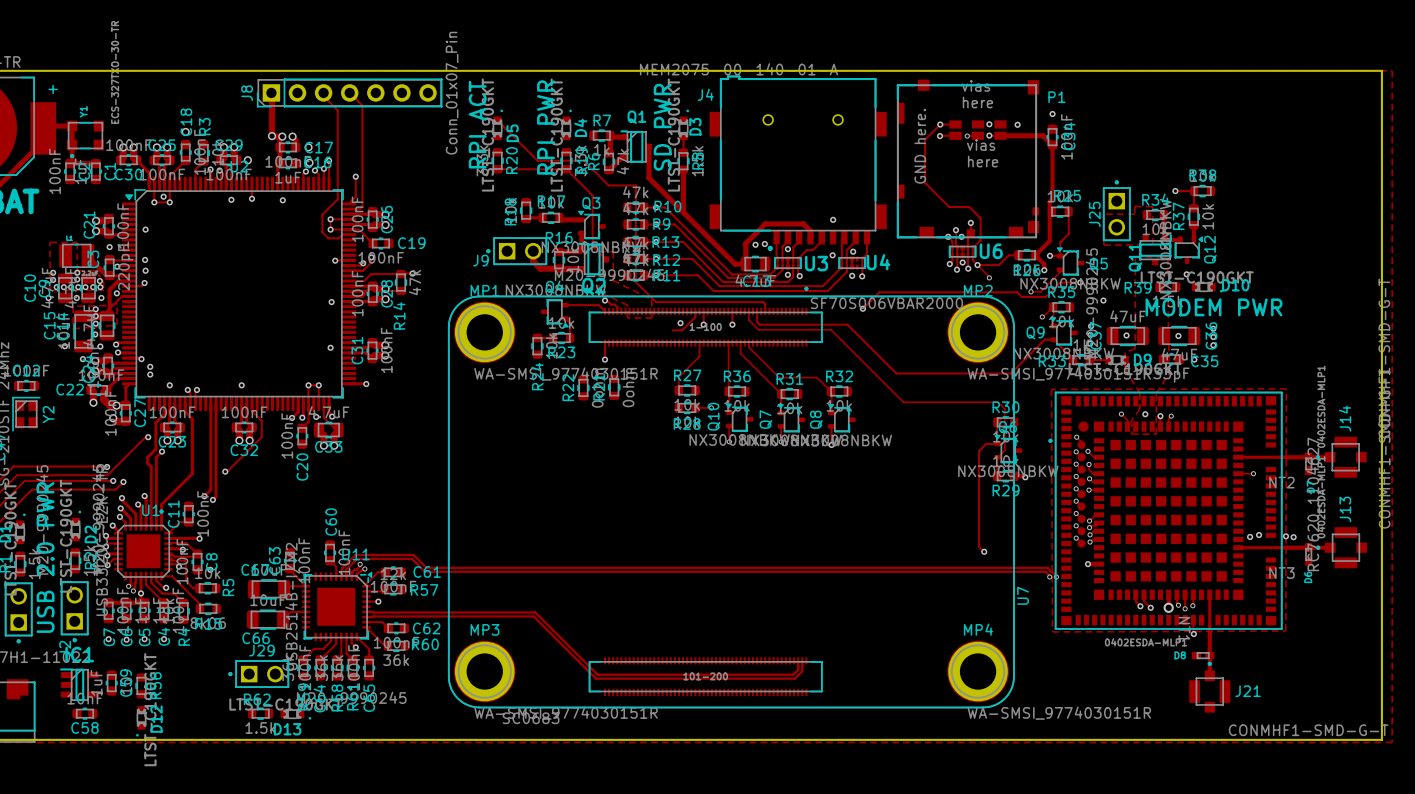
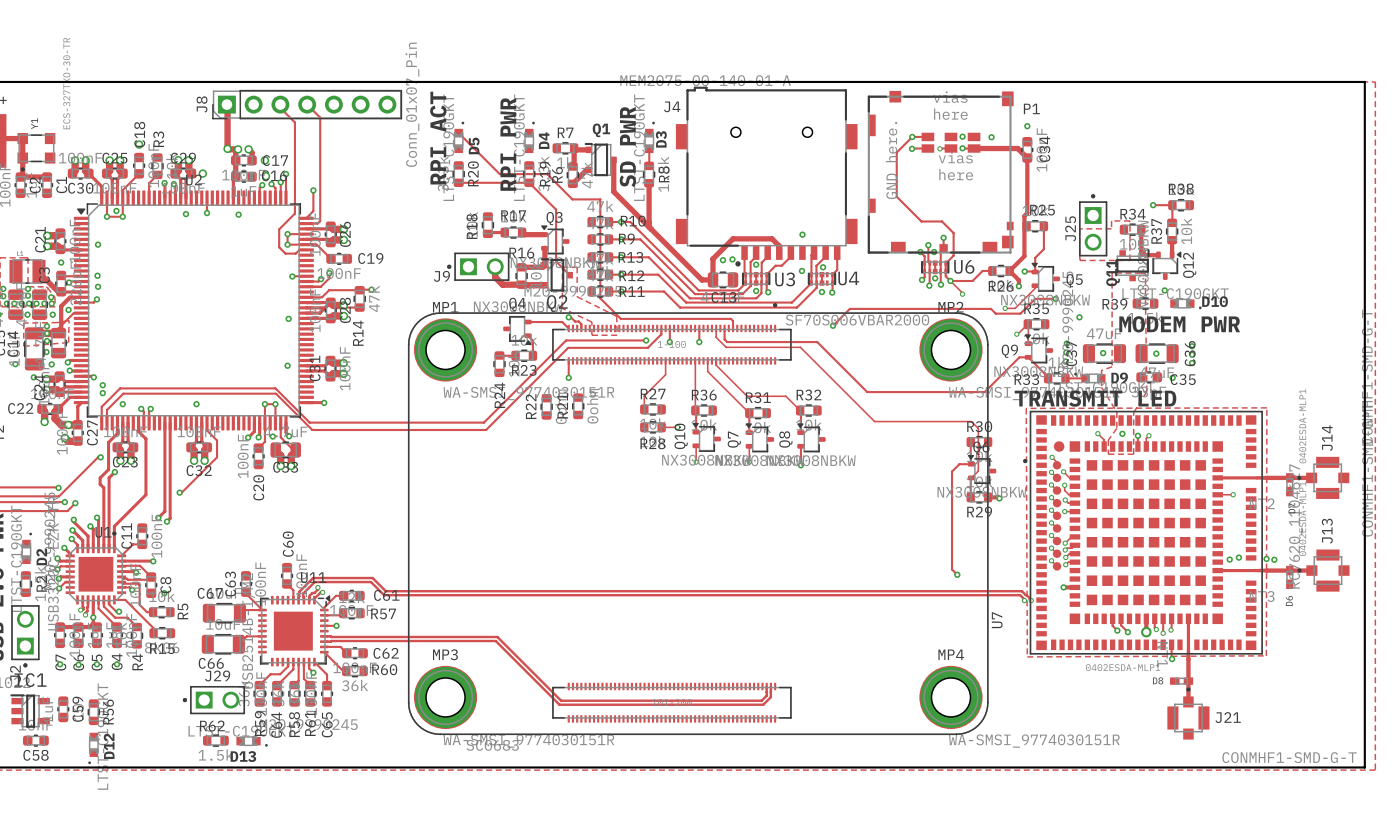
track: none -> (646, 340) (566, 340) (483, 422) (309, 422) (275, 388) (120, 388) (101, 406) (101, 422)
track: none -> (638, 347) (568, 347) (486, 429) (312, 429) (276, 393) (123, 393) (106, 409) (106, 422)
text: none -> TRANSMIT LED (1095, 398)

